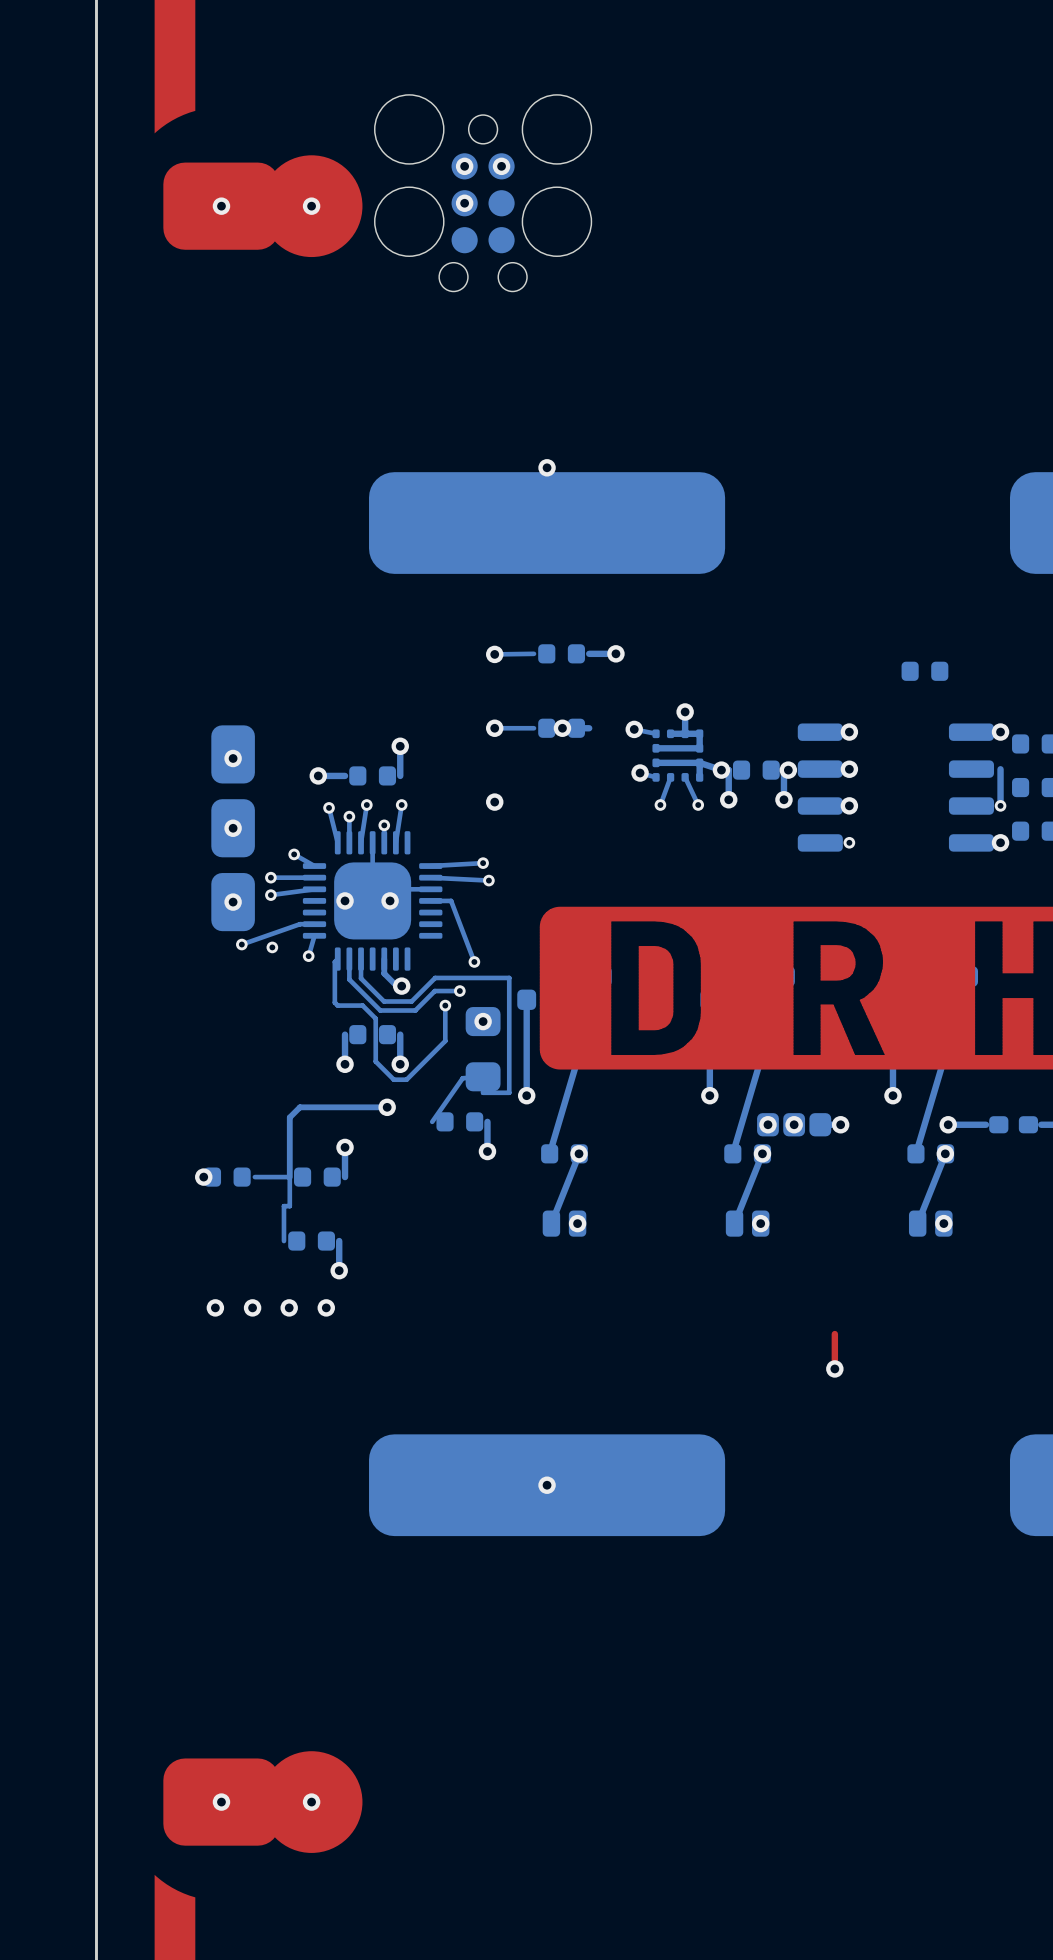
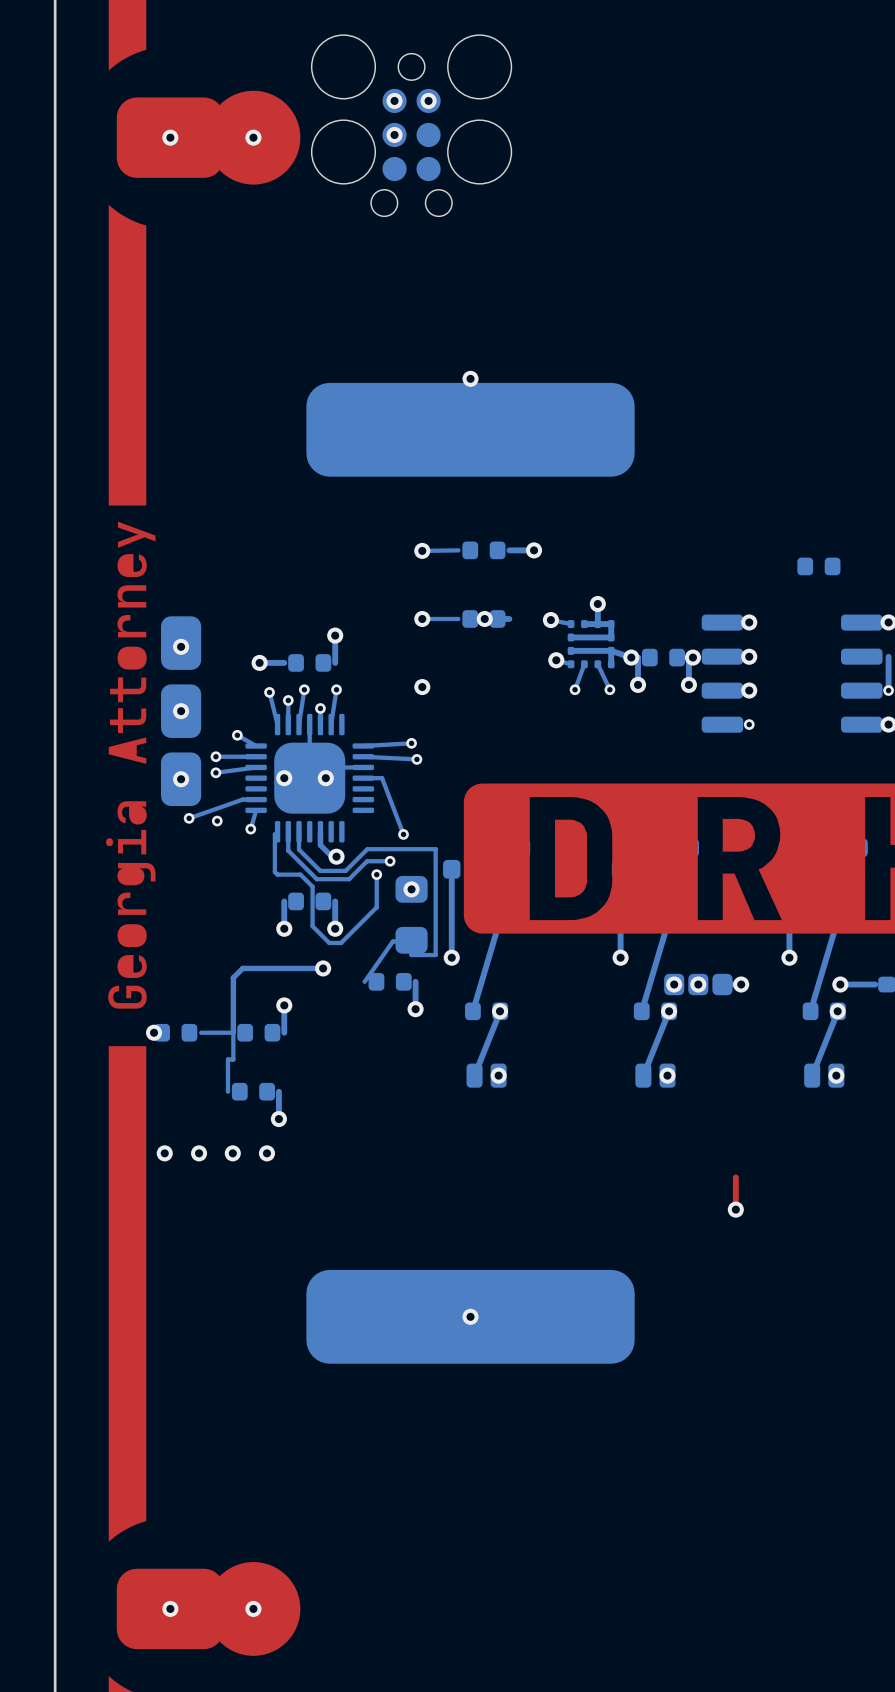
drawing: none -> [108, 204, 156, 764]
drawing: none -> [106, 801, 156, 1009]
drawing: none -> [108, 1046, 147, 1542]

